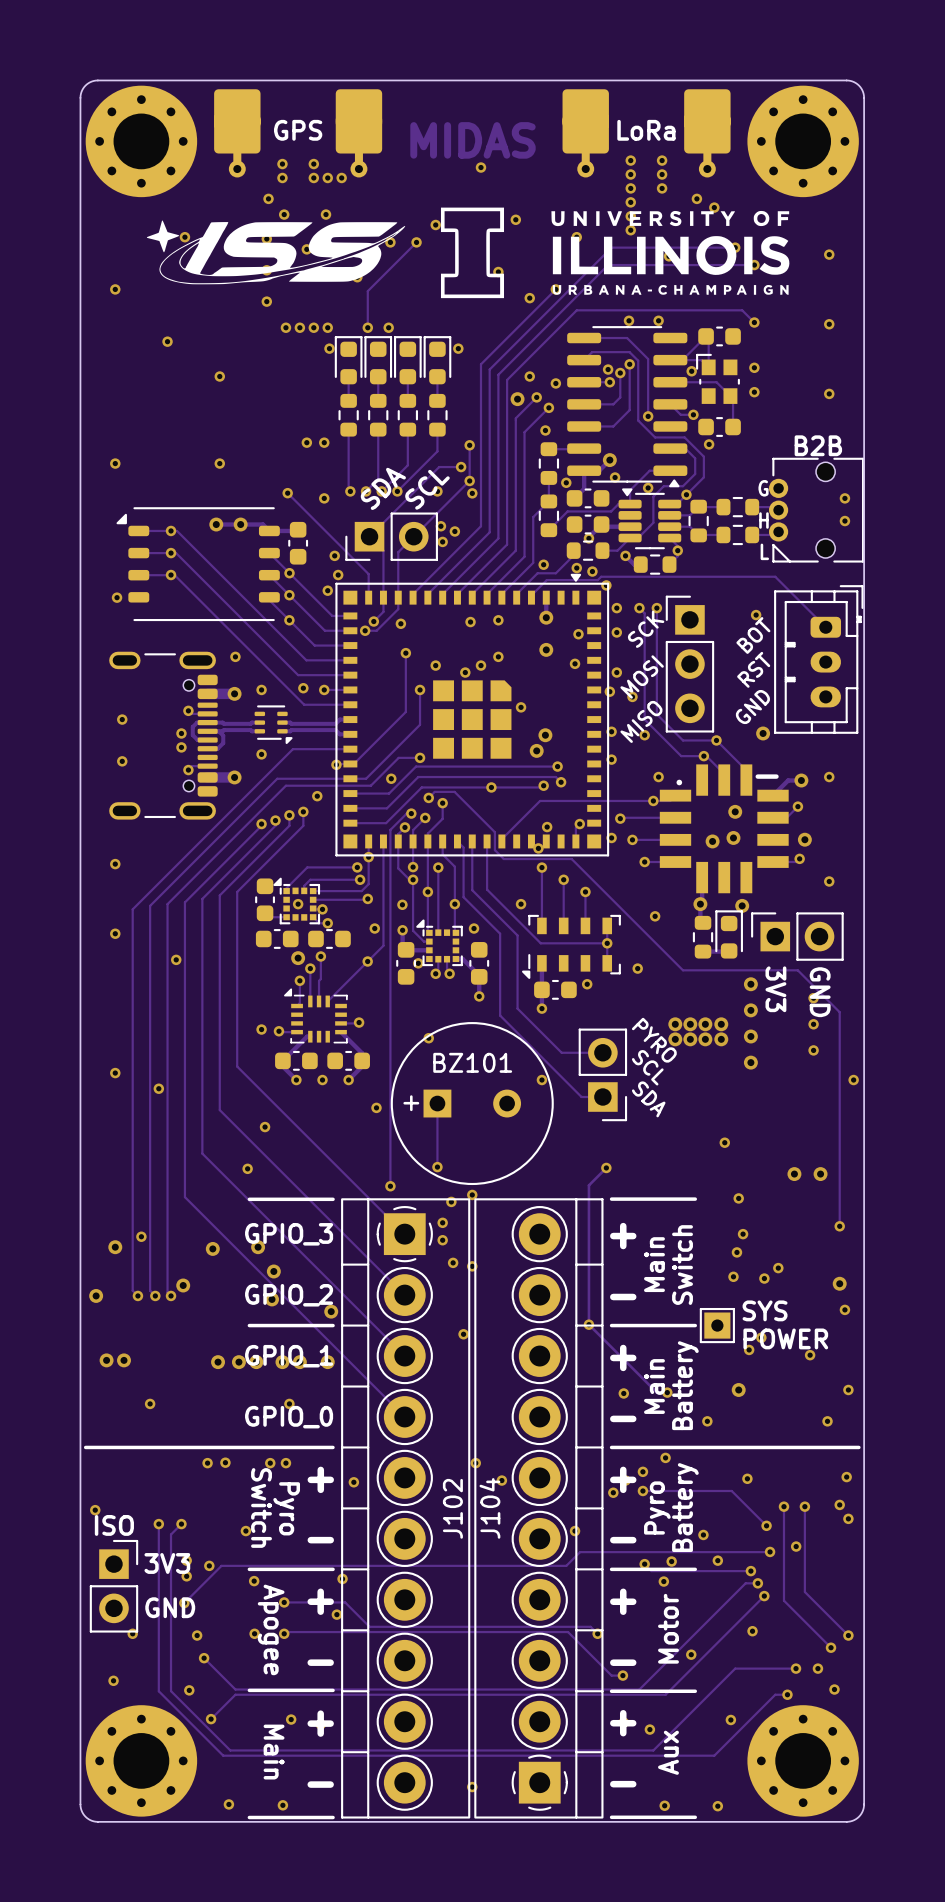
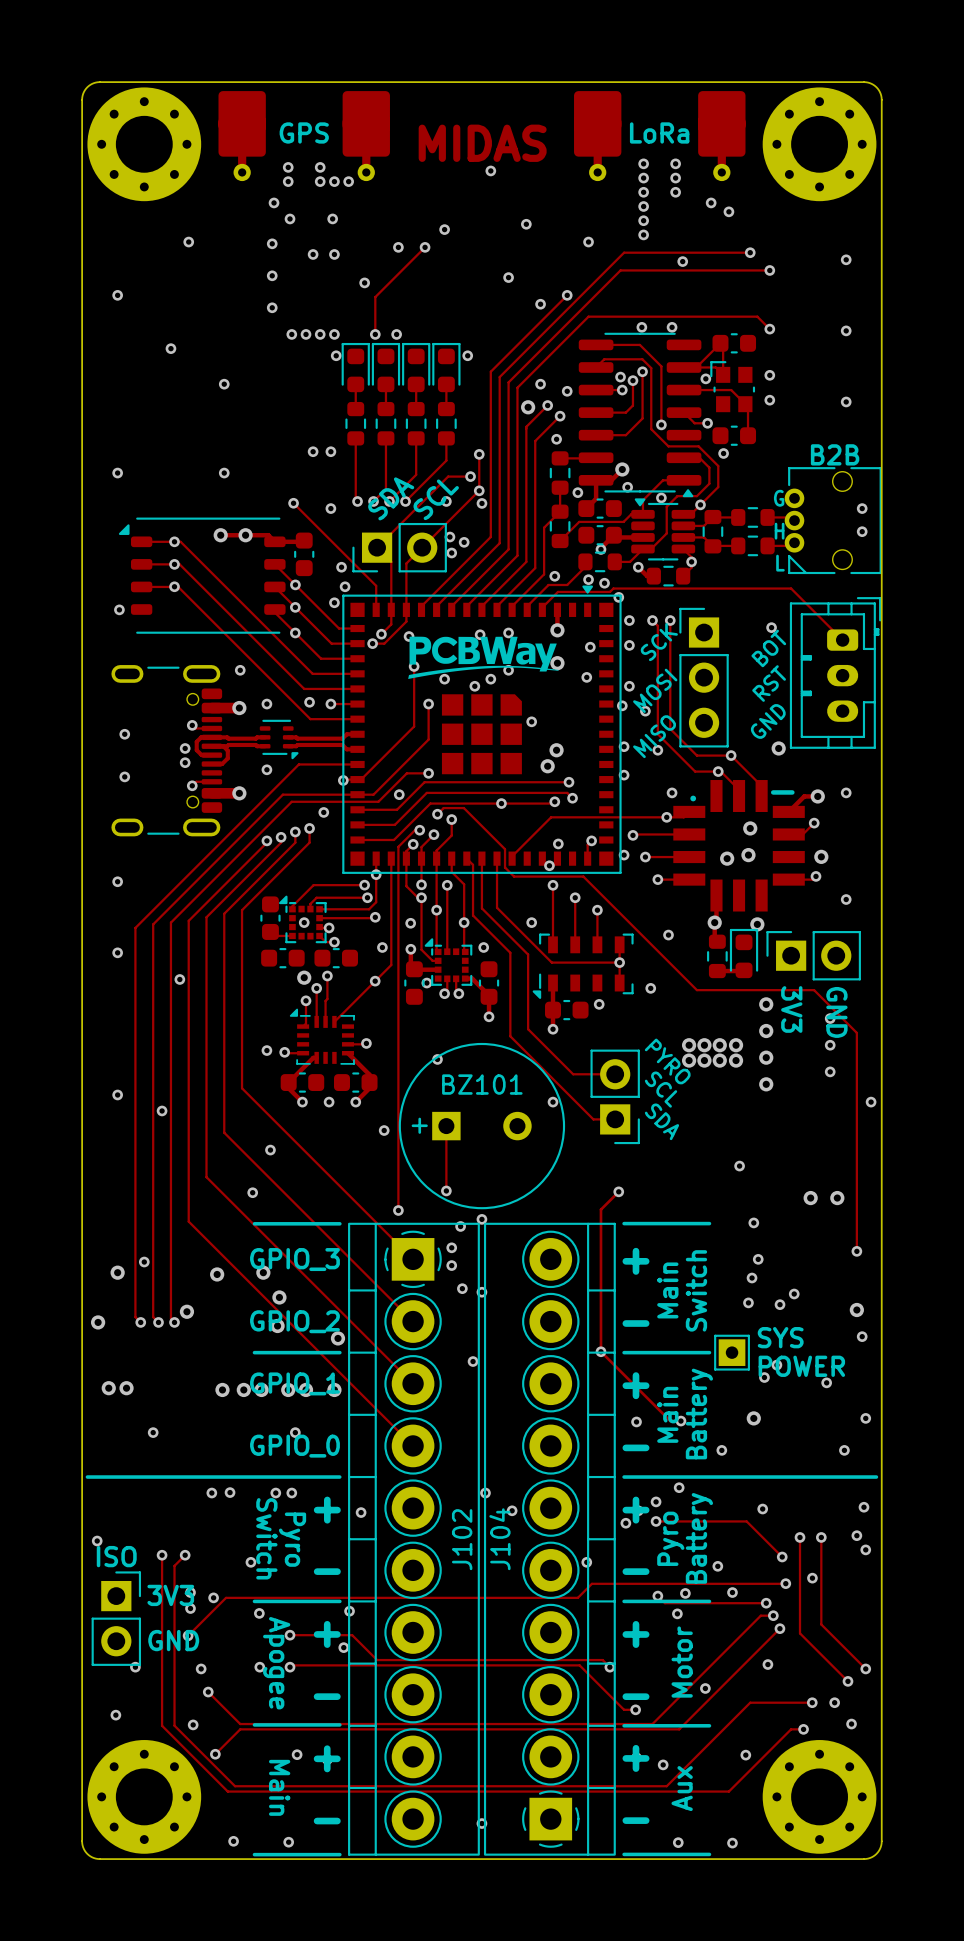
drawing: [440, 207, 790, 299] -> none
drawing: [146, 220, 406, 285] -> none
drawing: none -> [408, 636, 559, 679]

